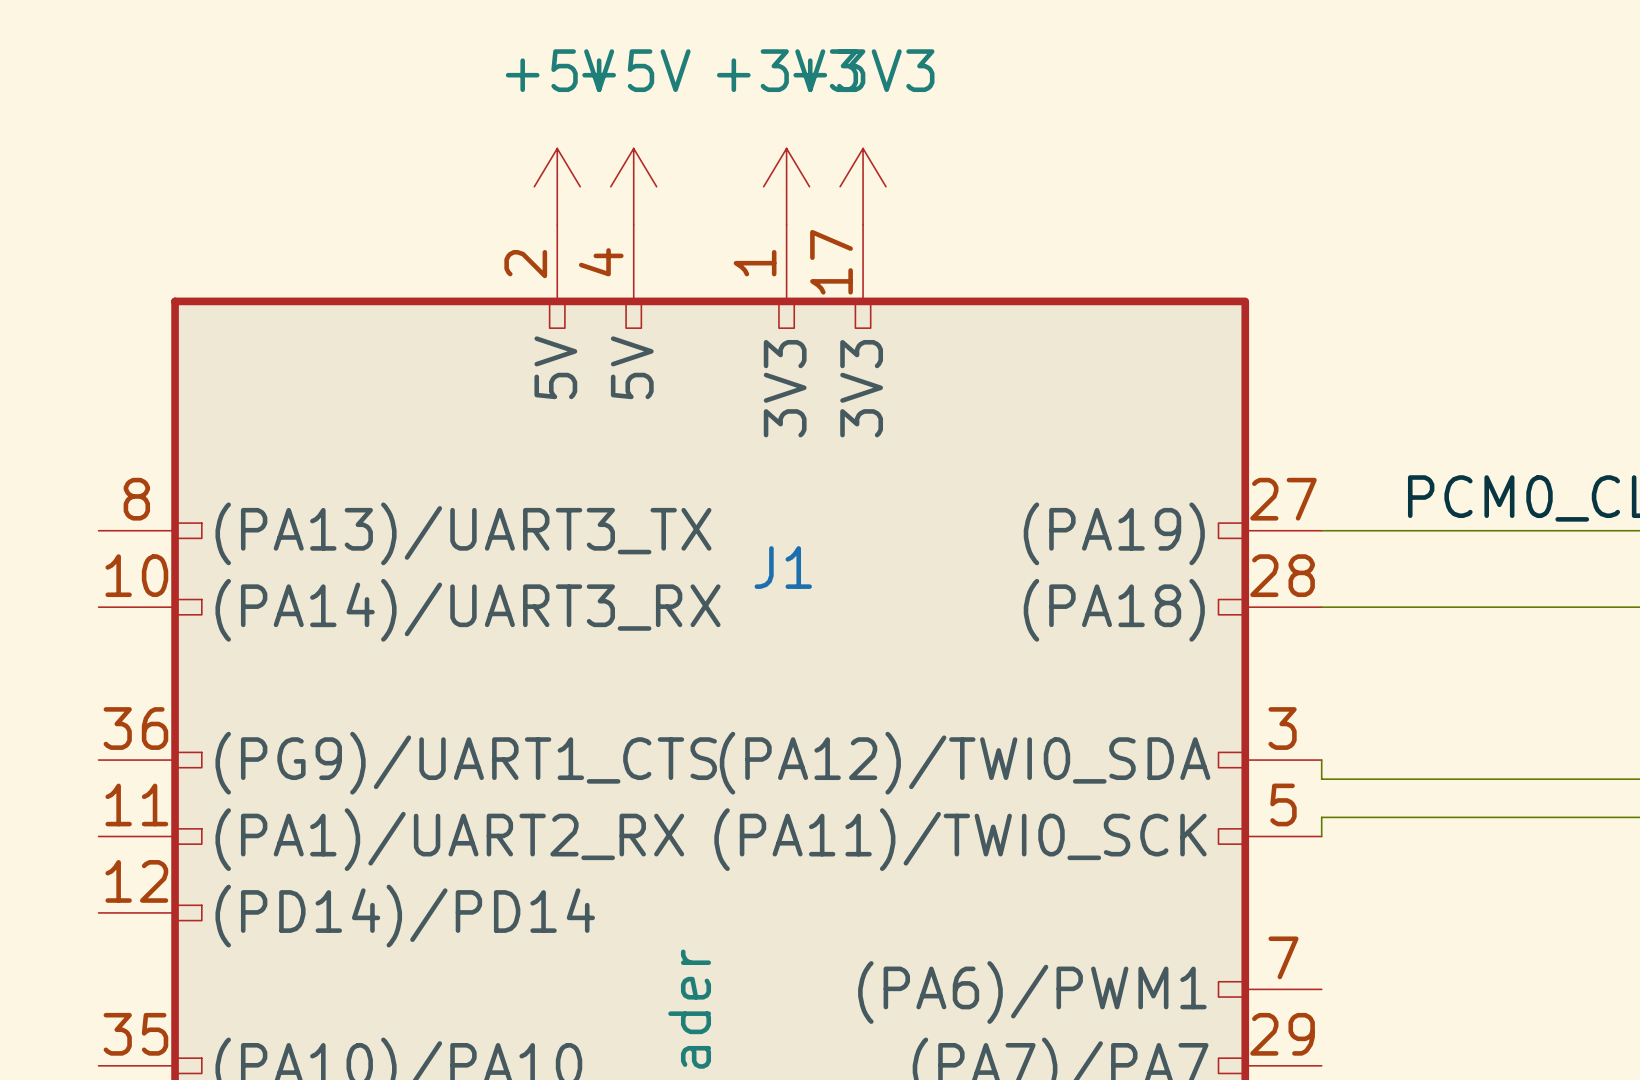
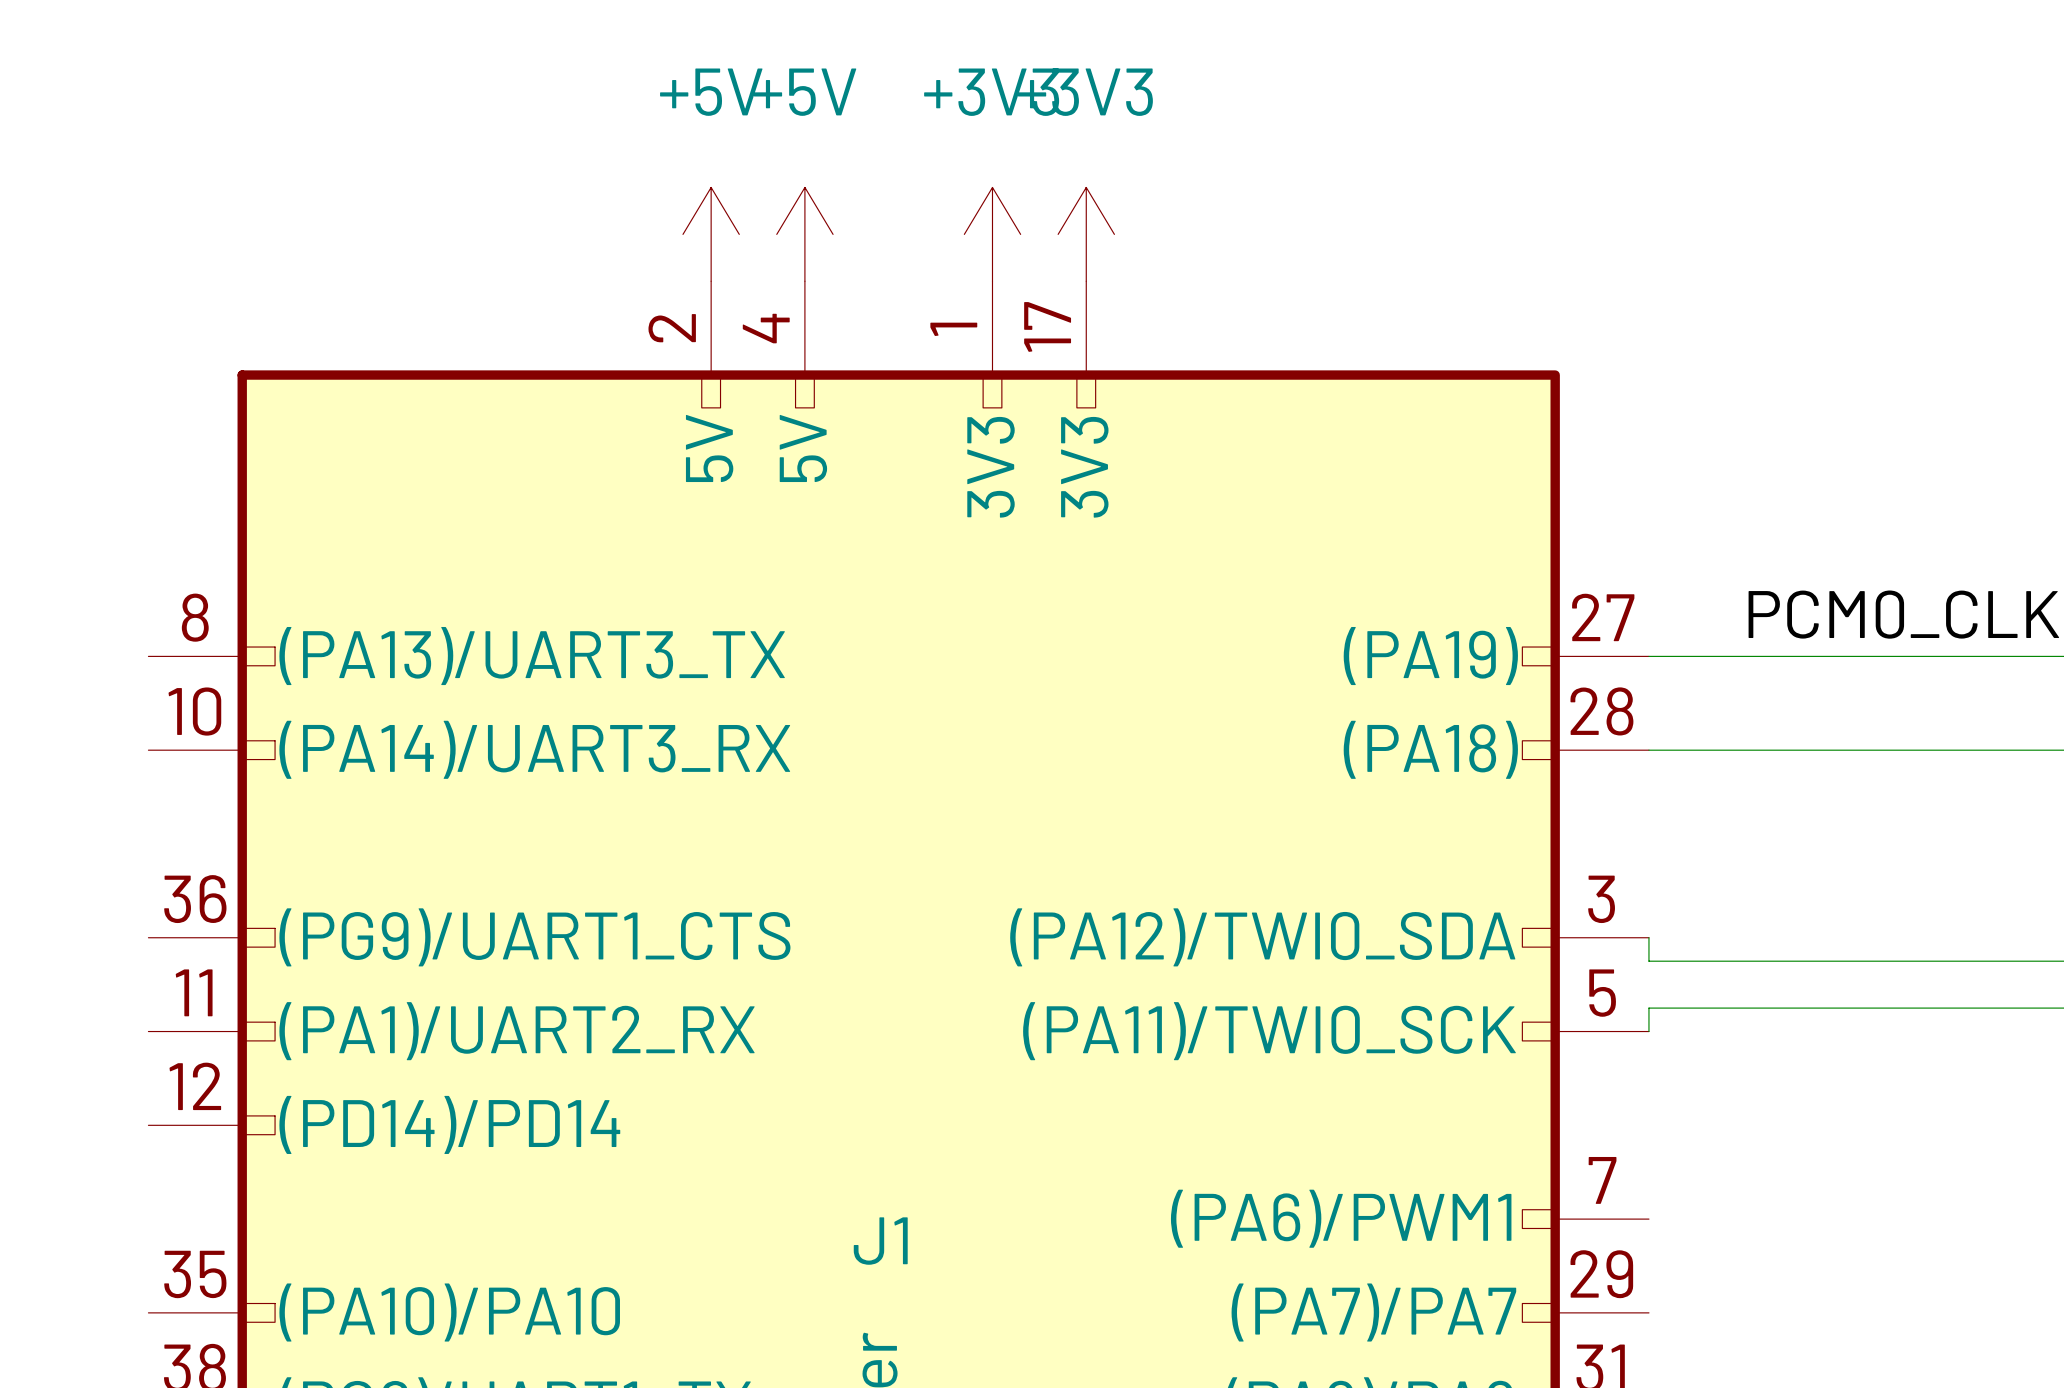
J1 name position: J1 (783, 567) -> J1 (880, 1241)

